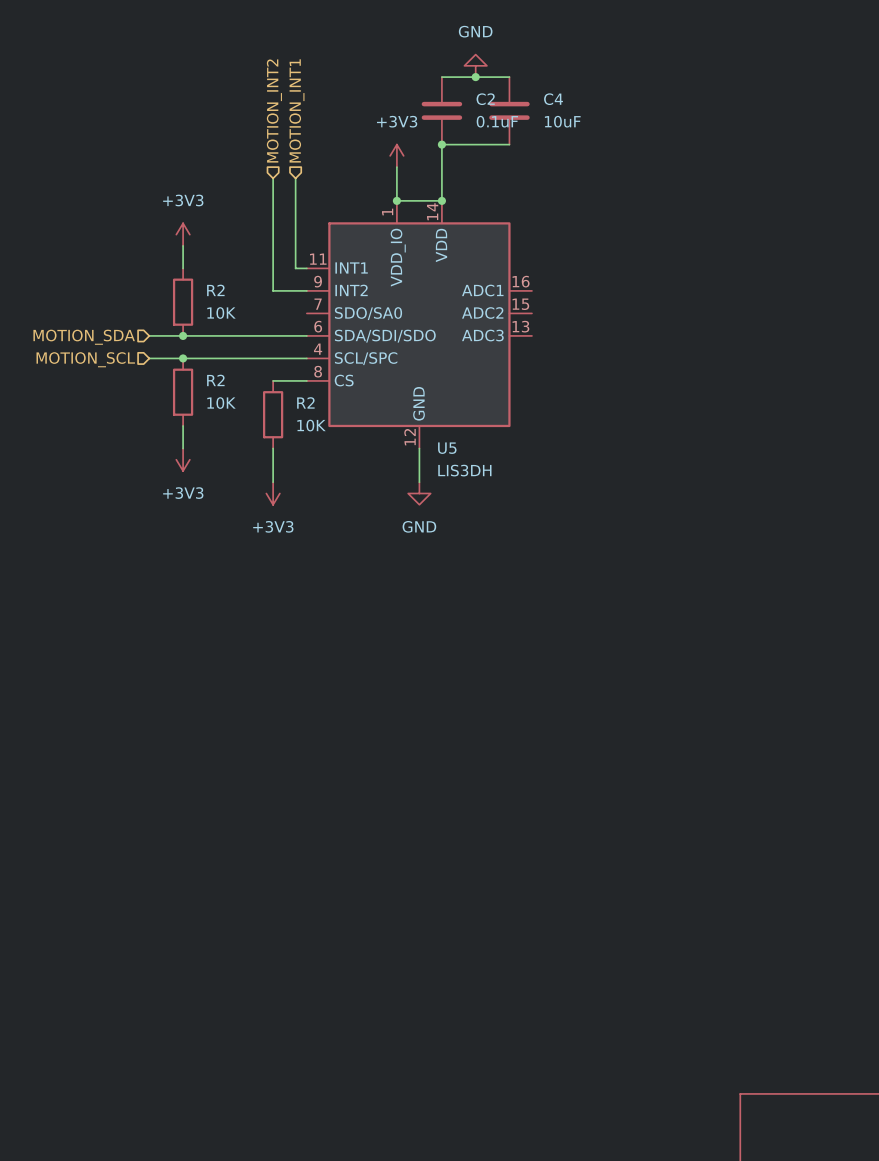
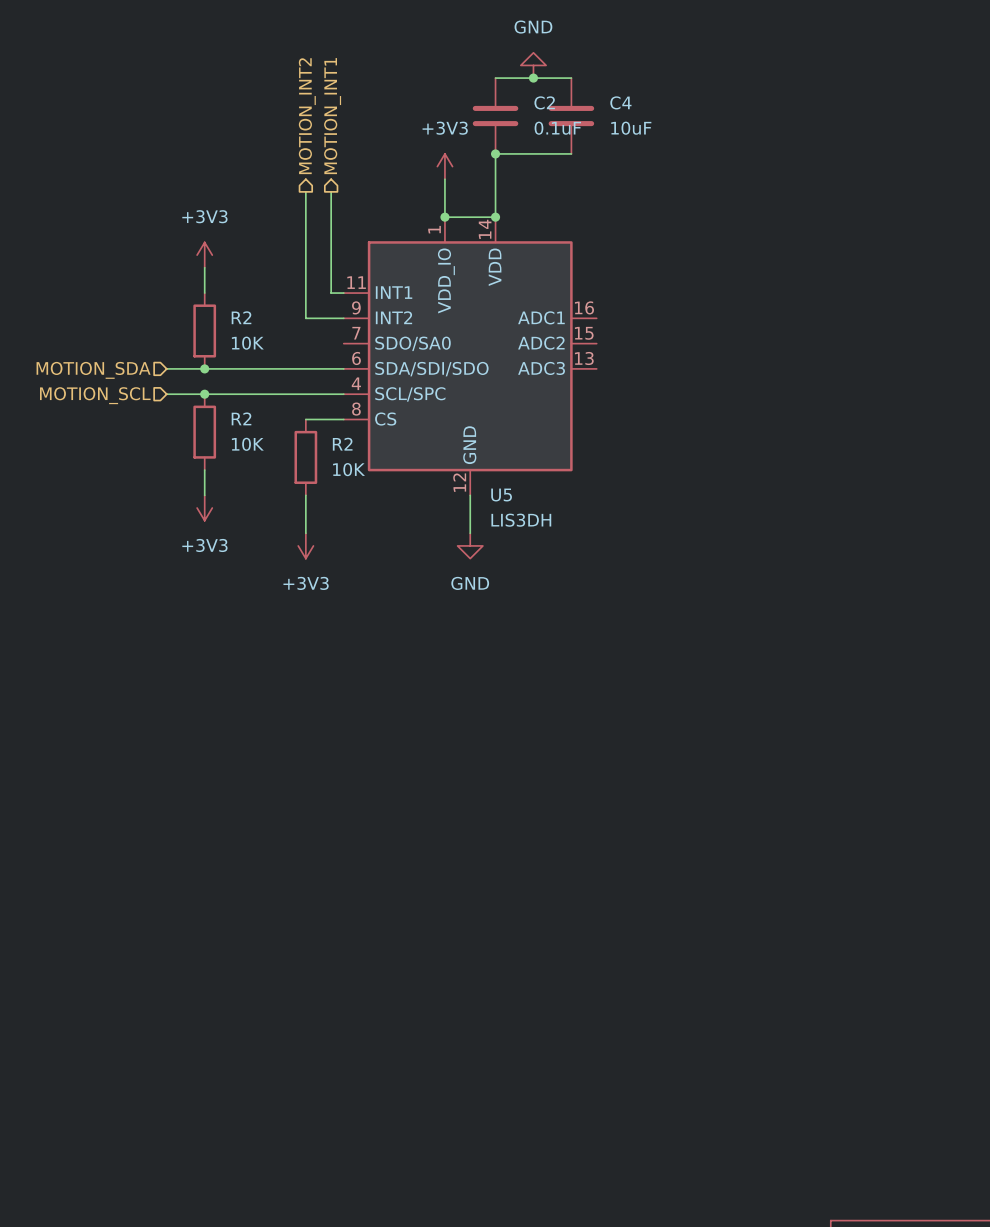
hierarchical label shape: input (274, 110) -> output (307, 116)
hierarchical label shape: input (296, 110) -> output (332, 116)

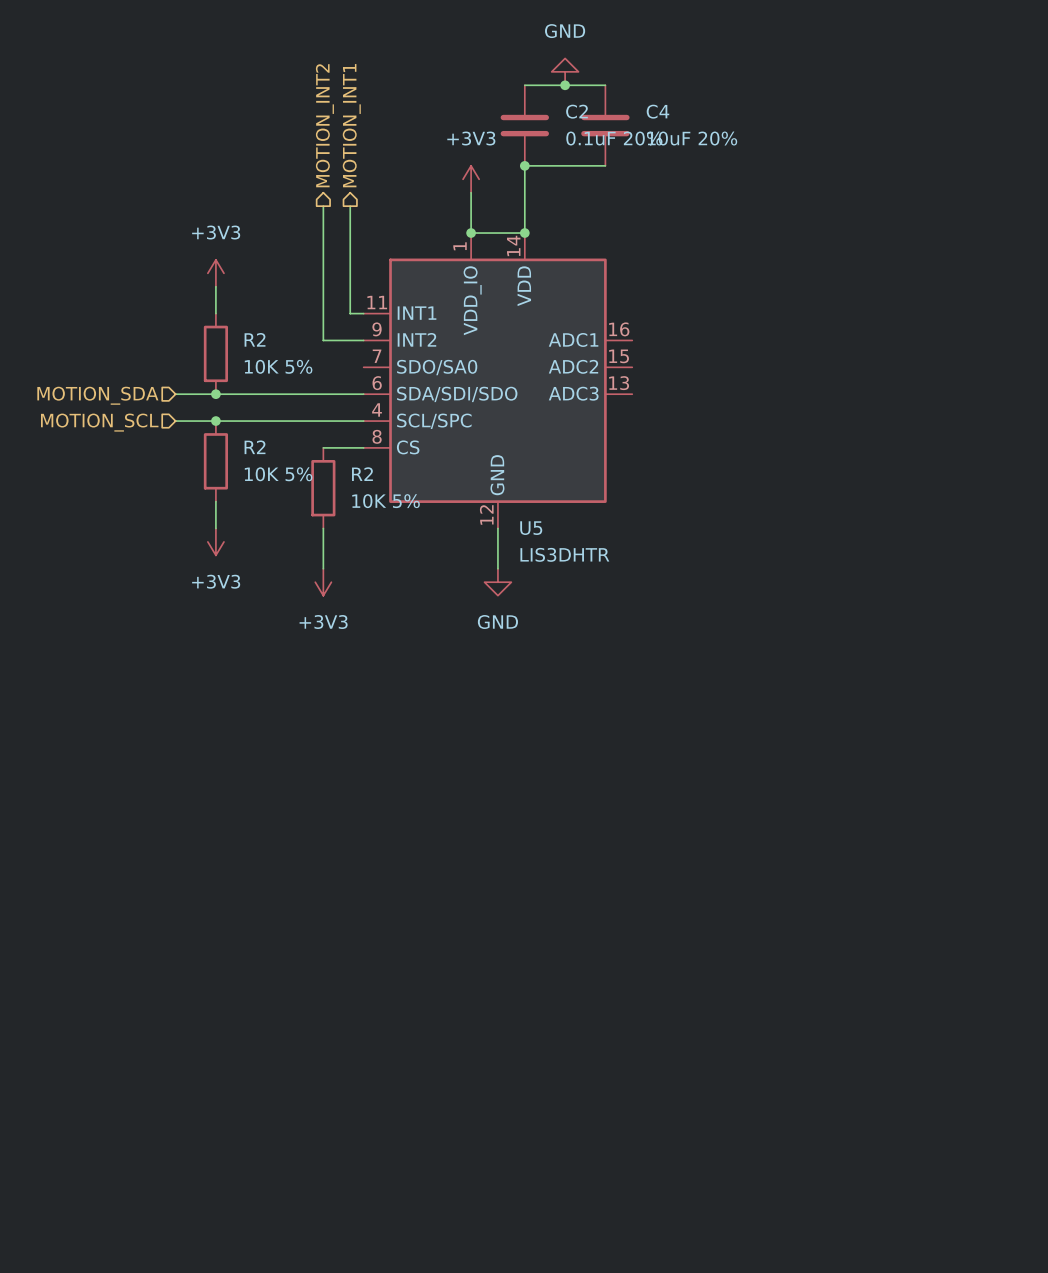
C2 value: 0.1uF (557, 128) -> 0.1uF 20% (614, 138)
C4 value: 10uF (631, 128) -> 10uF 20% (692, 138)
R2 value: 10K (247, 343) -> 10K 5% (278, 366)
R2 value: 10K (247, 444) -> 10K 5% (278, 474)
R2 value: 10K (349, 469) -> 10K 5% (386, 501)
U5 value: LIS3DH (521, 520) -> LIS3DHTR (564, 554)

